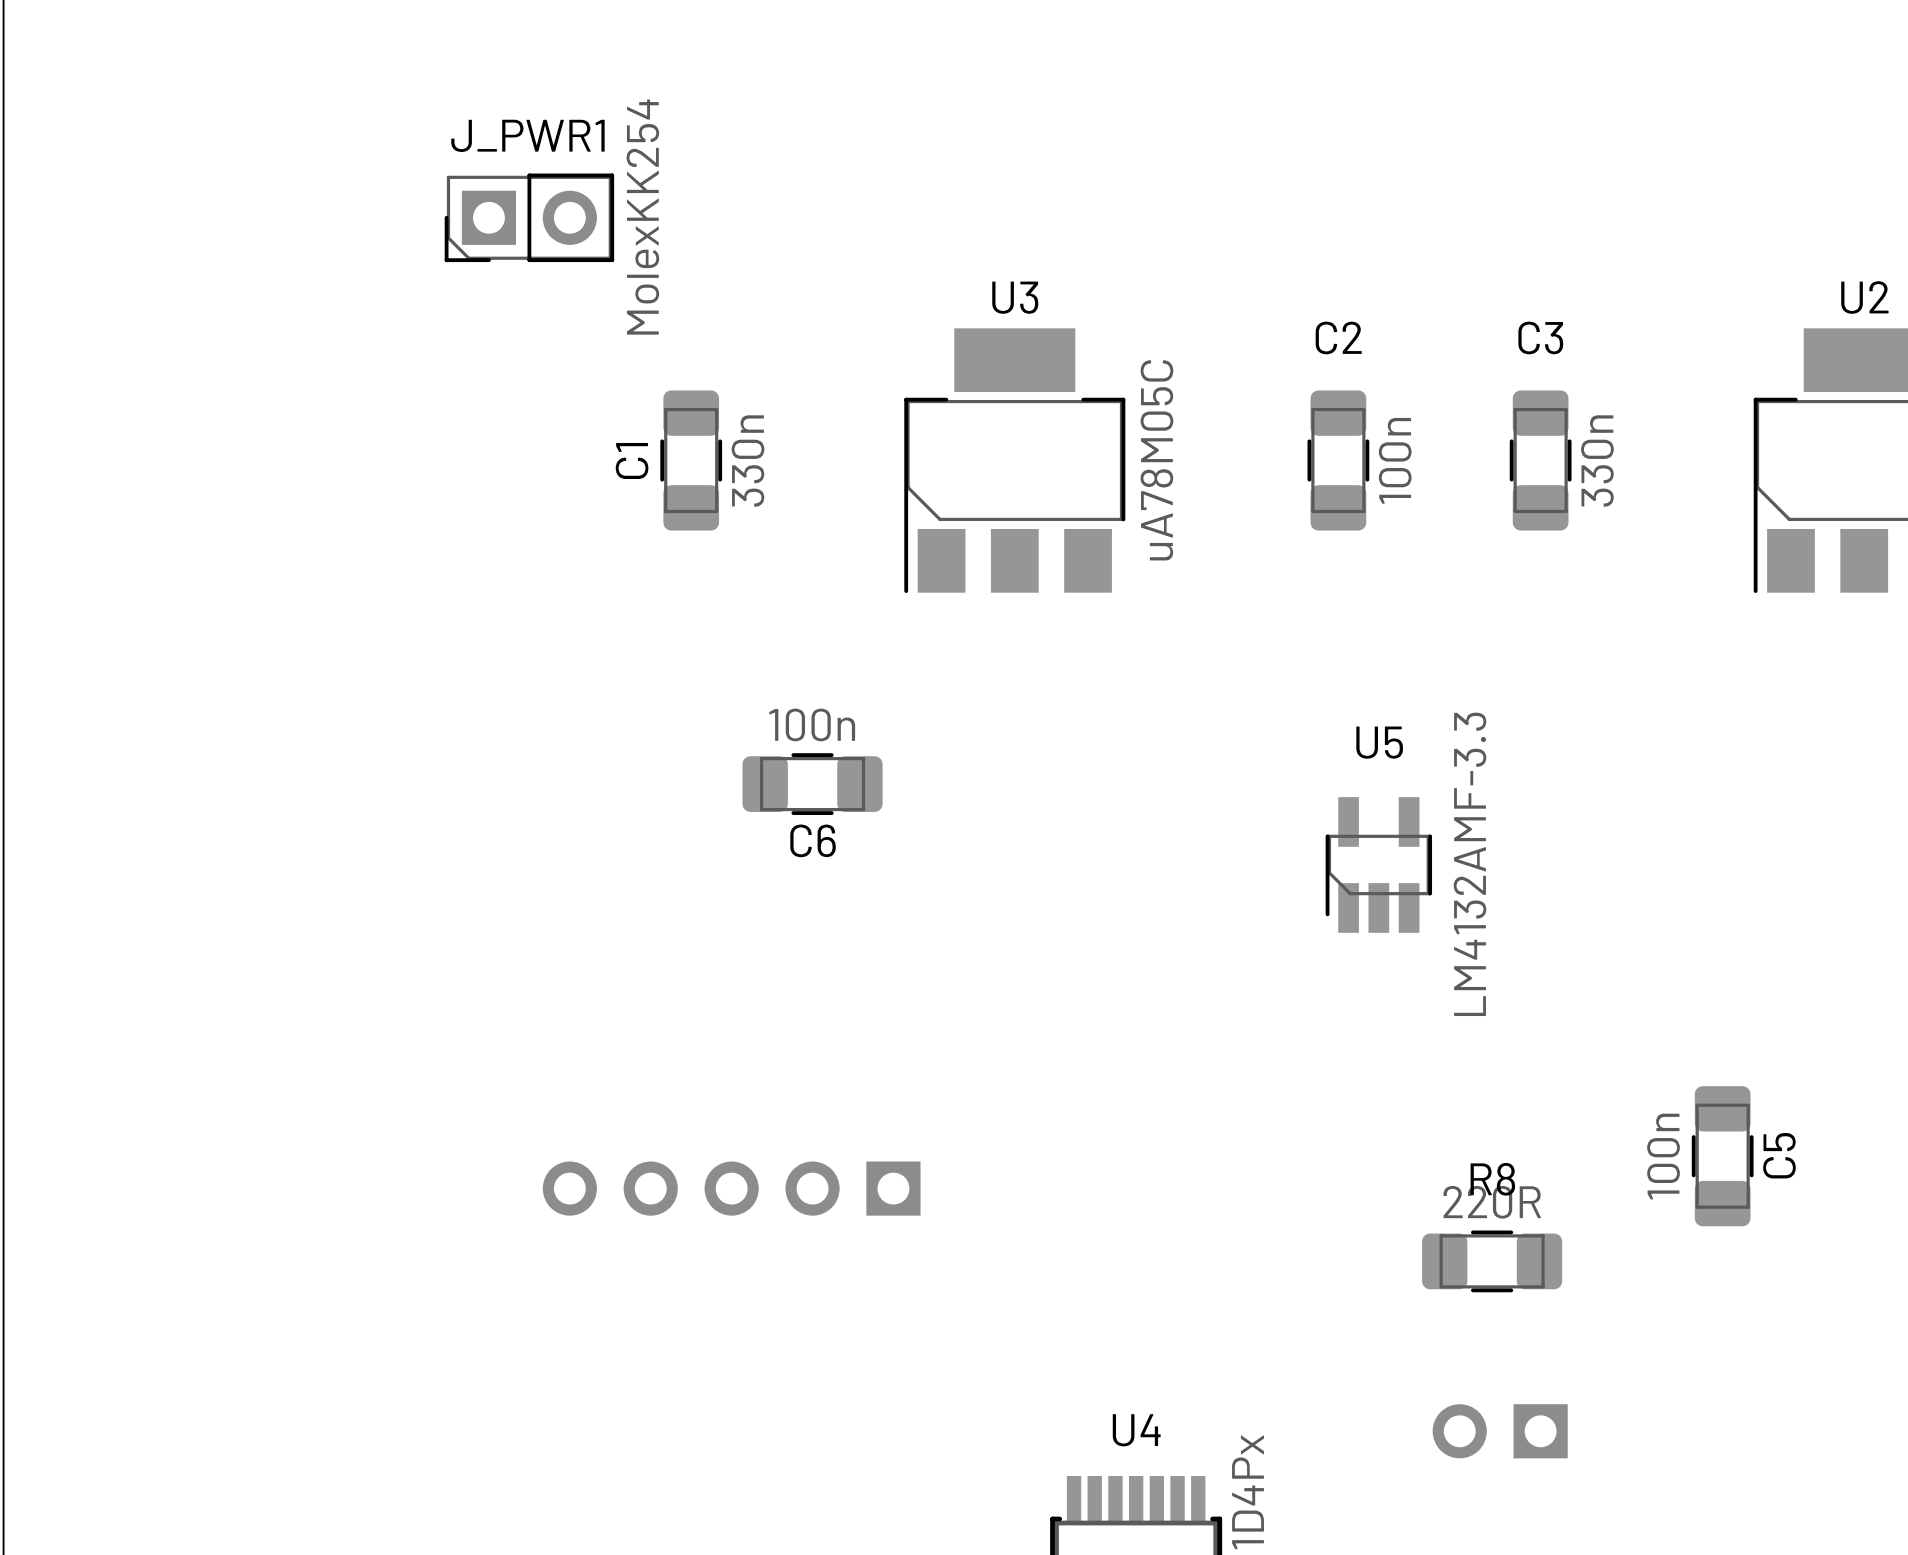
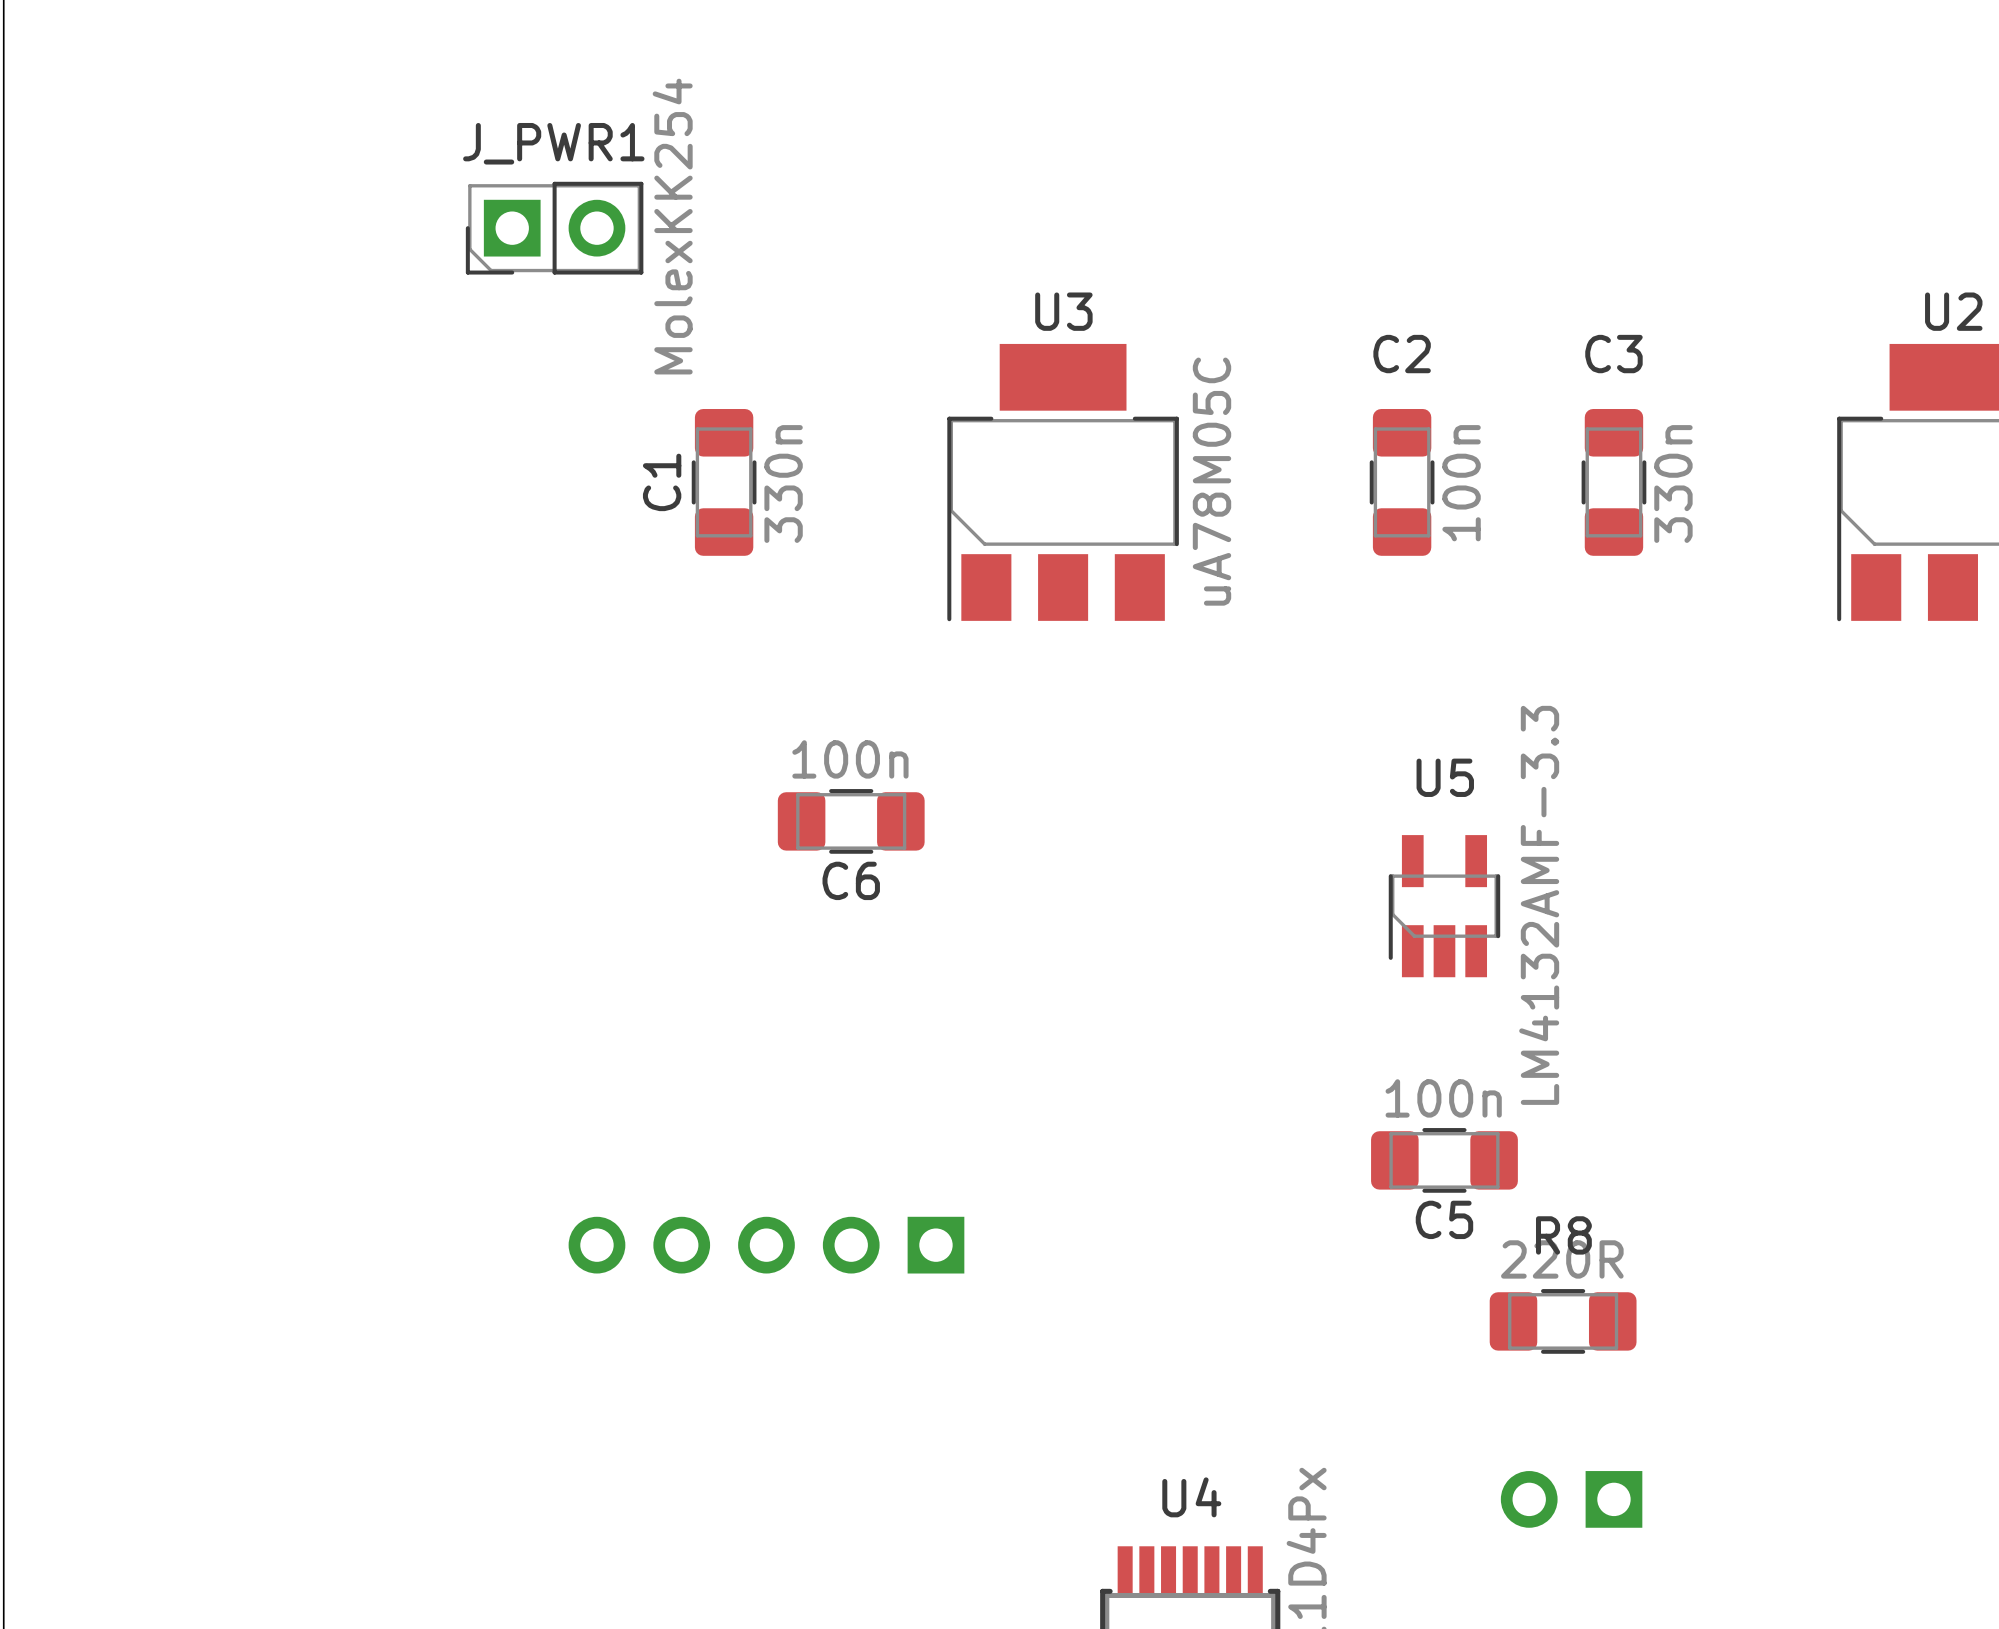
C5 rotation: 0° (1722, 1156) -> 90° clockwise (1444, 1160)
C5 position: (1722, 1156) -> (1444, 1160)

